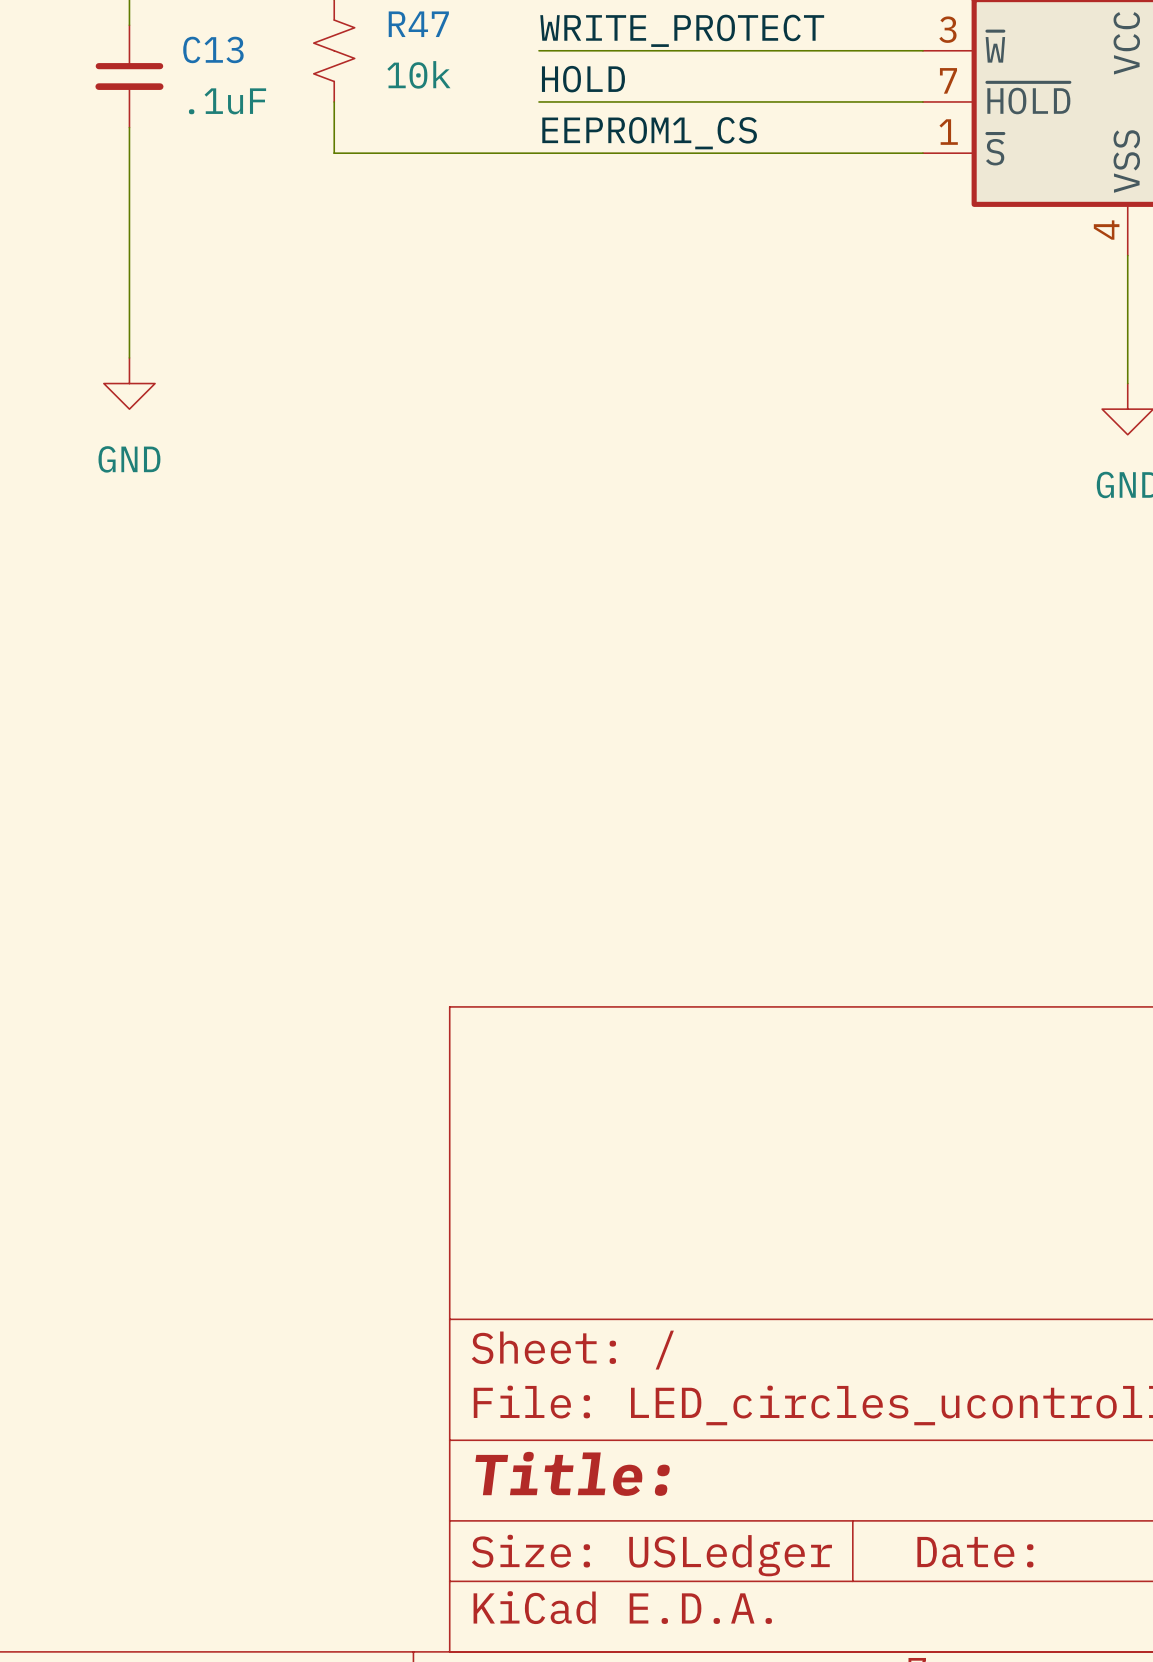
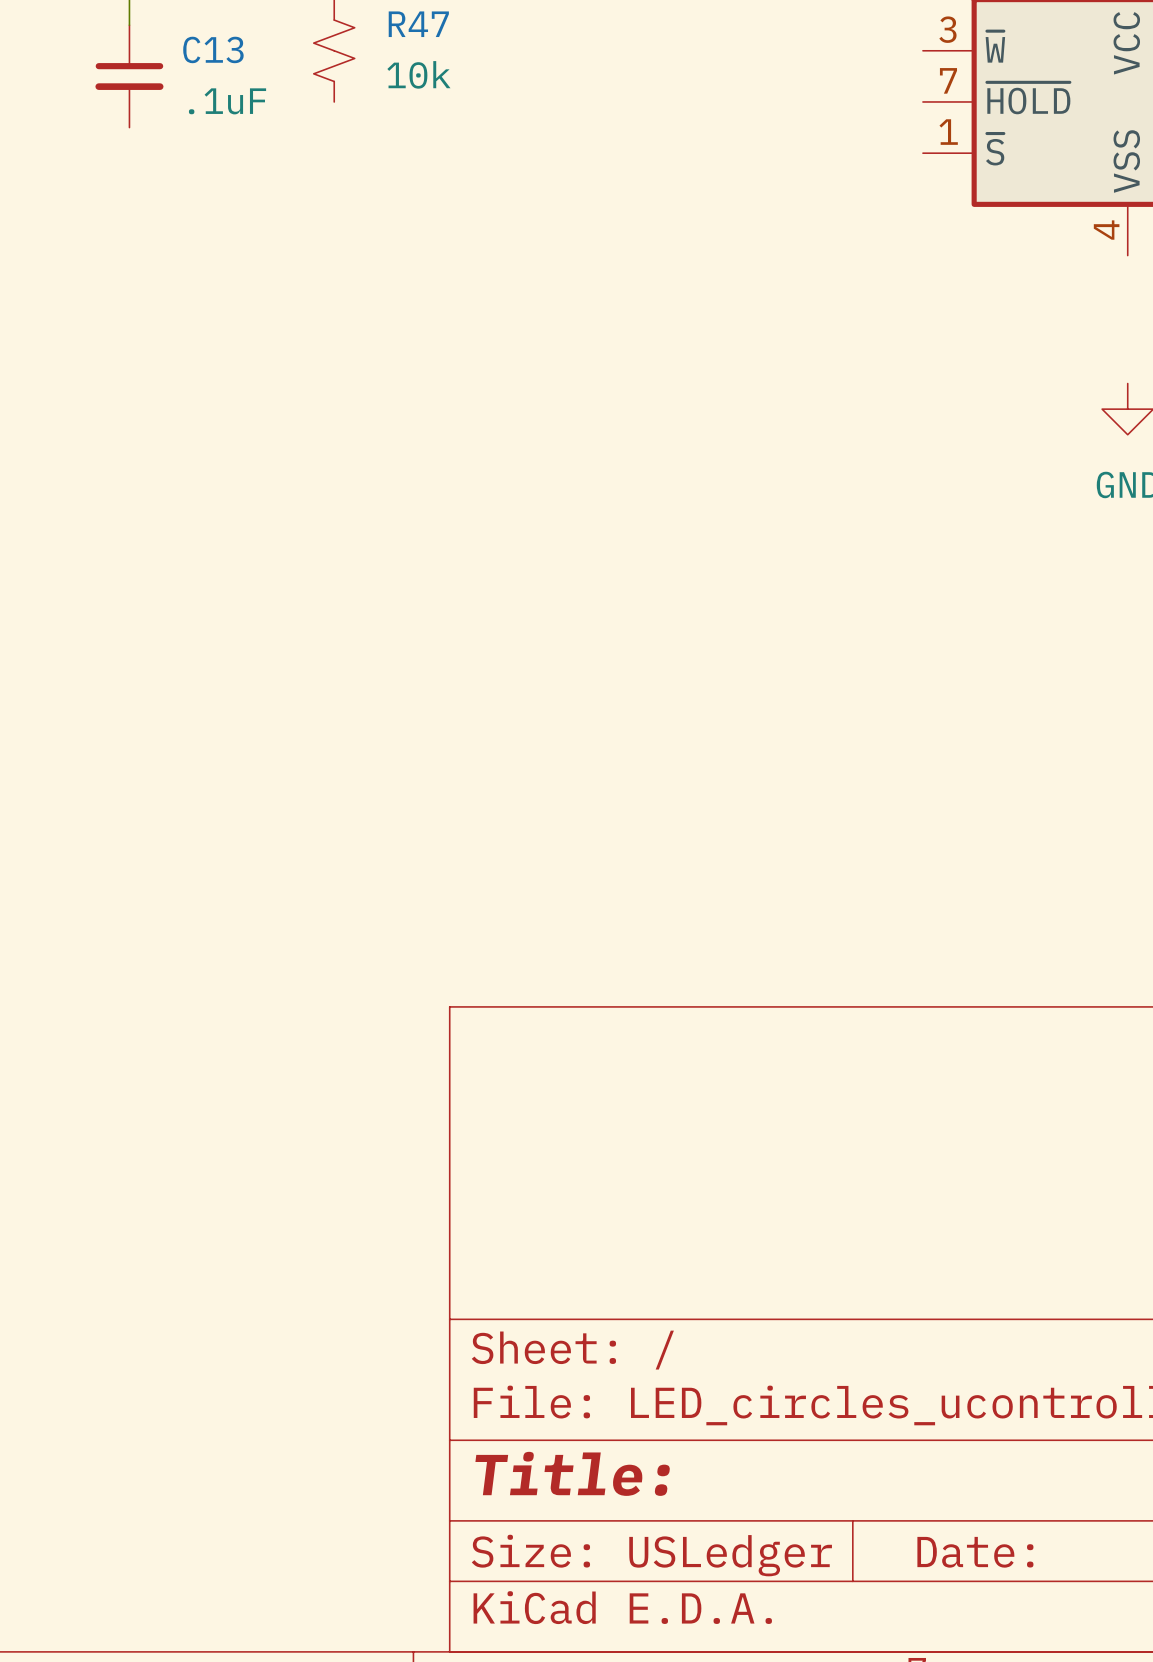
label: WRITE_PROTECT (682, 30) -> none
wire: (539, 50) (922, 50) -> none
label: HOLD (583, 79) -> none
wire: (334, 101) (334, 153) (922, 153) -> none
wire: (539, 101) (922, 101) -> none
wire: (129, 127) (129, 357) -> none
label: EEPROM1_CS (649, 133) -> none
wire: (1127, 255) (1127, 383) -> none
power symbol: GND (129, 383) -> none

